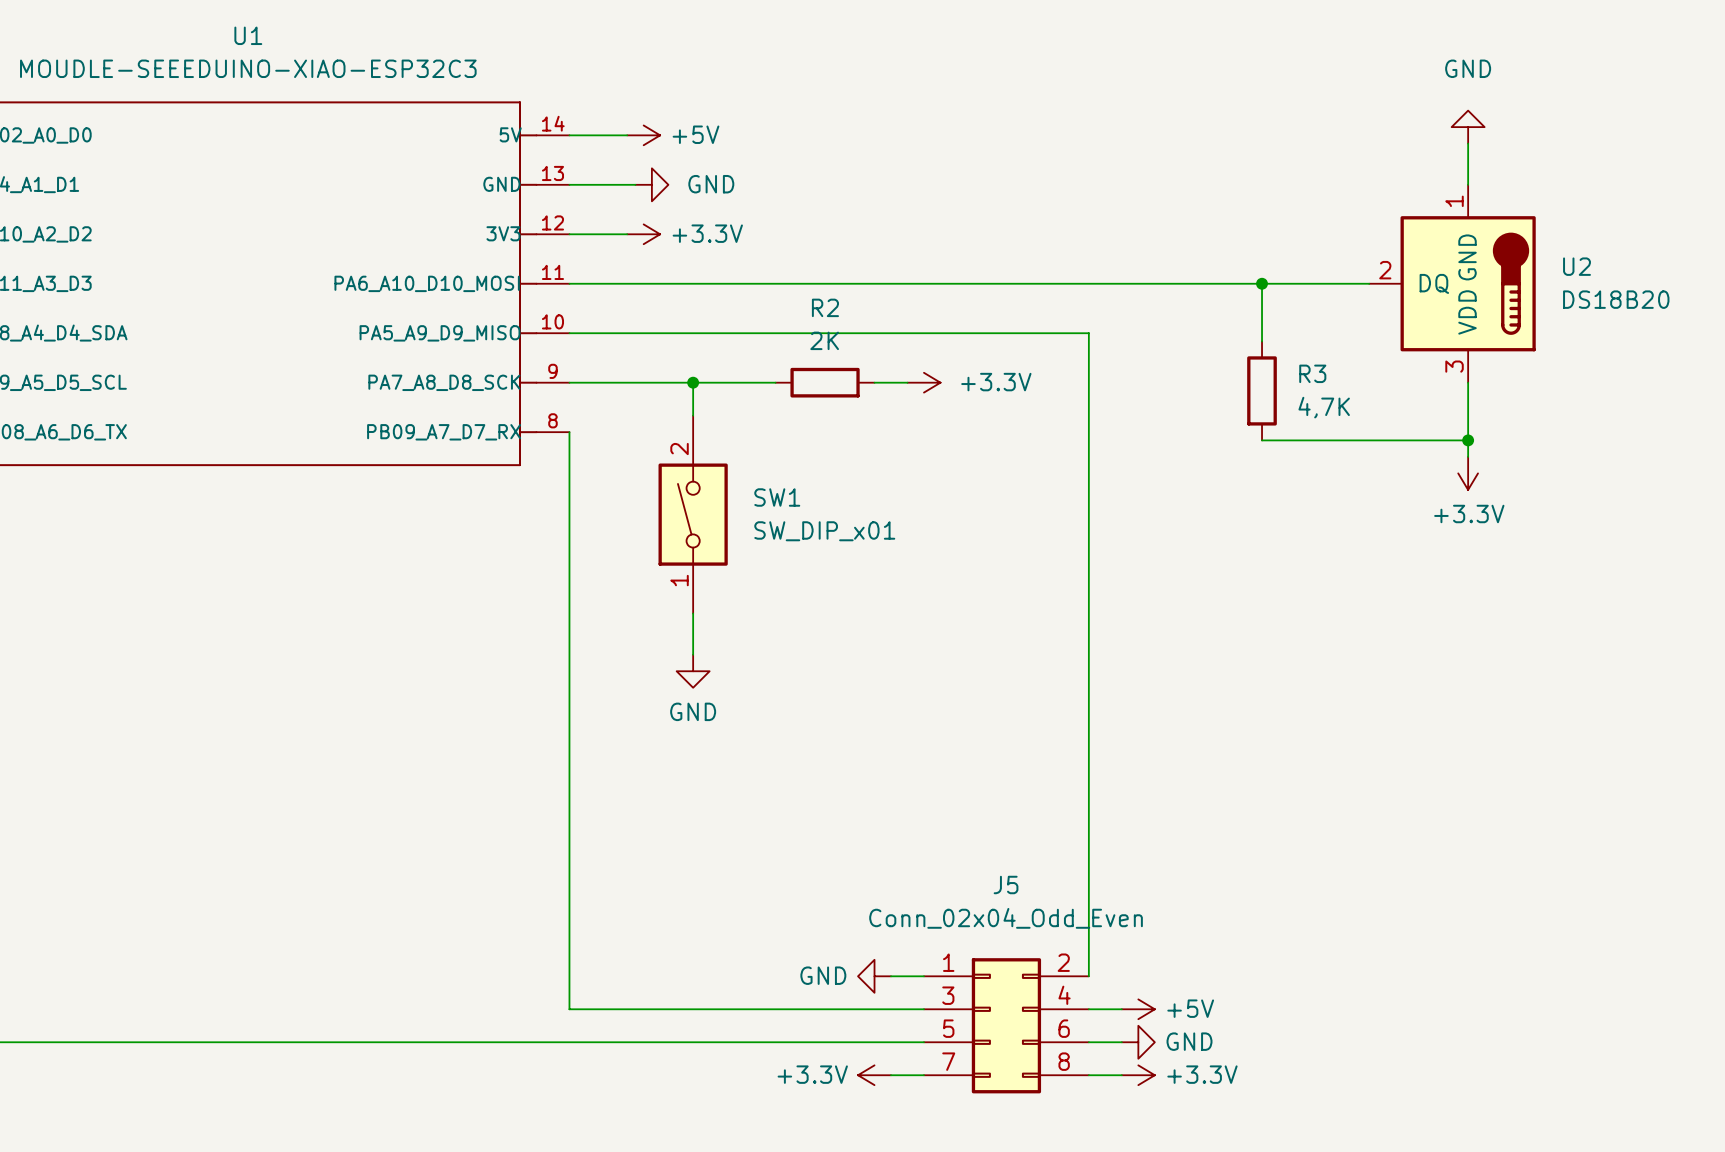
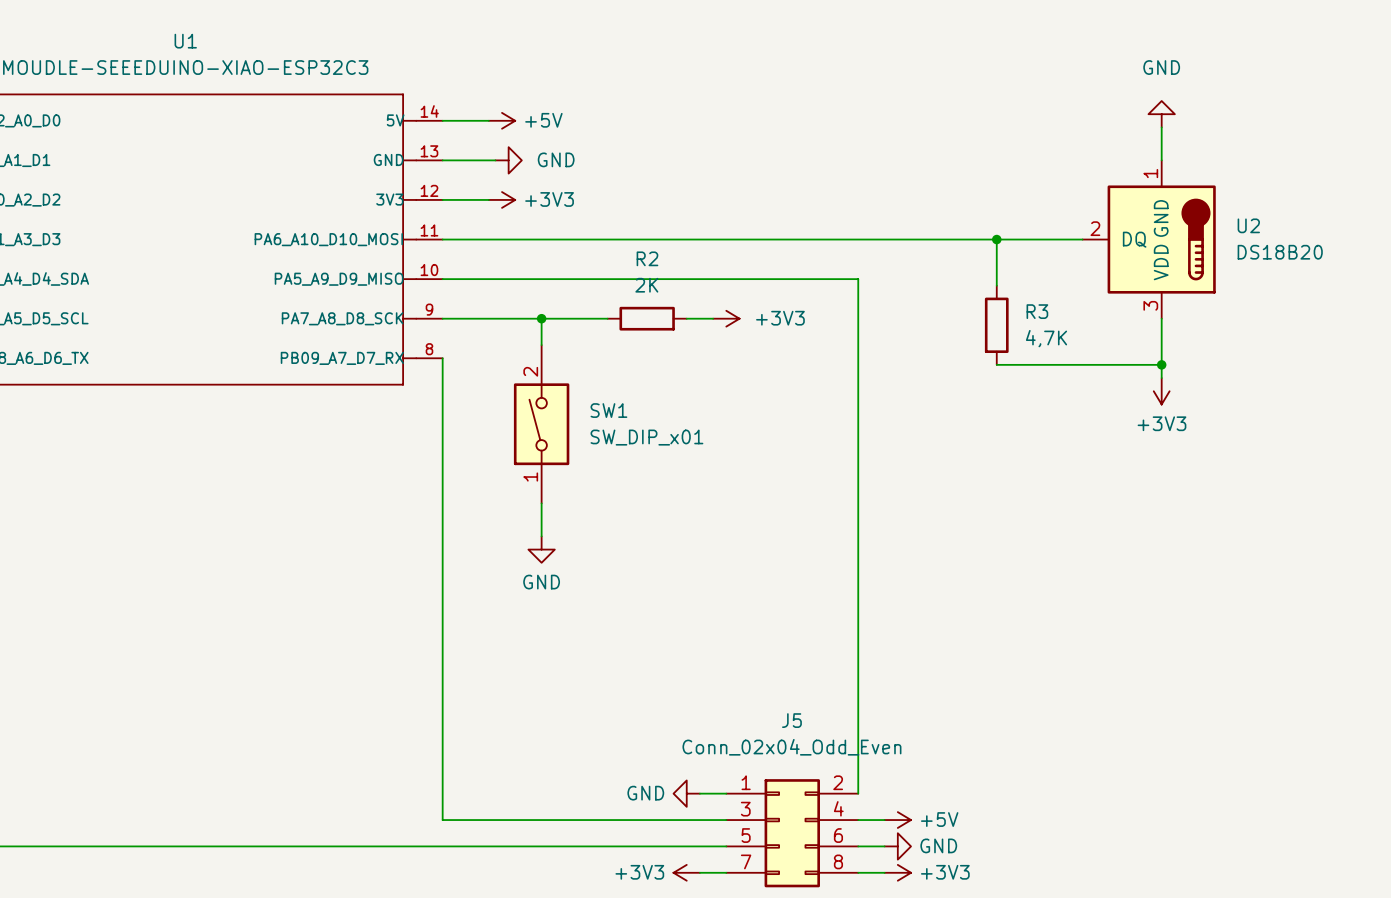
power symbol: +3.3V (643, 234) -> +3V3 (502, 199)
power symbol: +3.3V (923, 382) -> +3V3 (726, 318)
power symbol: +3.3V (1468, 473) -> +3V3 (1161, 391)
power symbol: +3.3V (874, 1075) -> +3V3 (686, 872)
power symbol: +3.3V (1138, 1075) -> +3V3 (897, 872)

